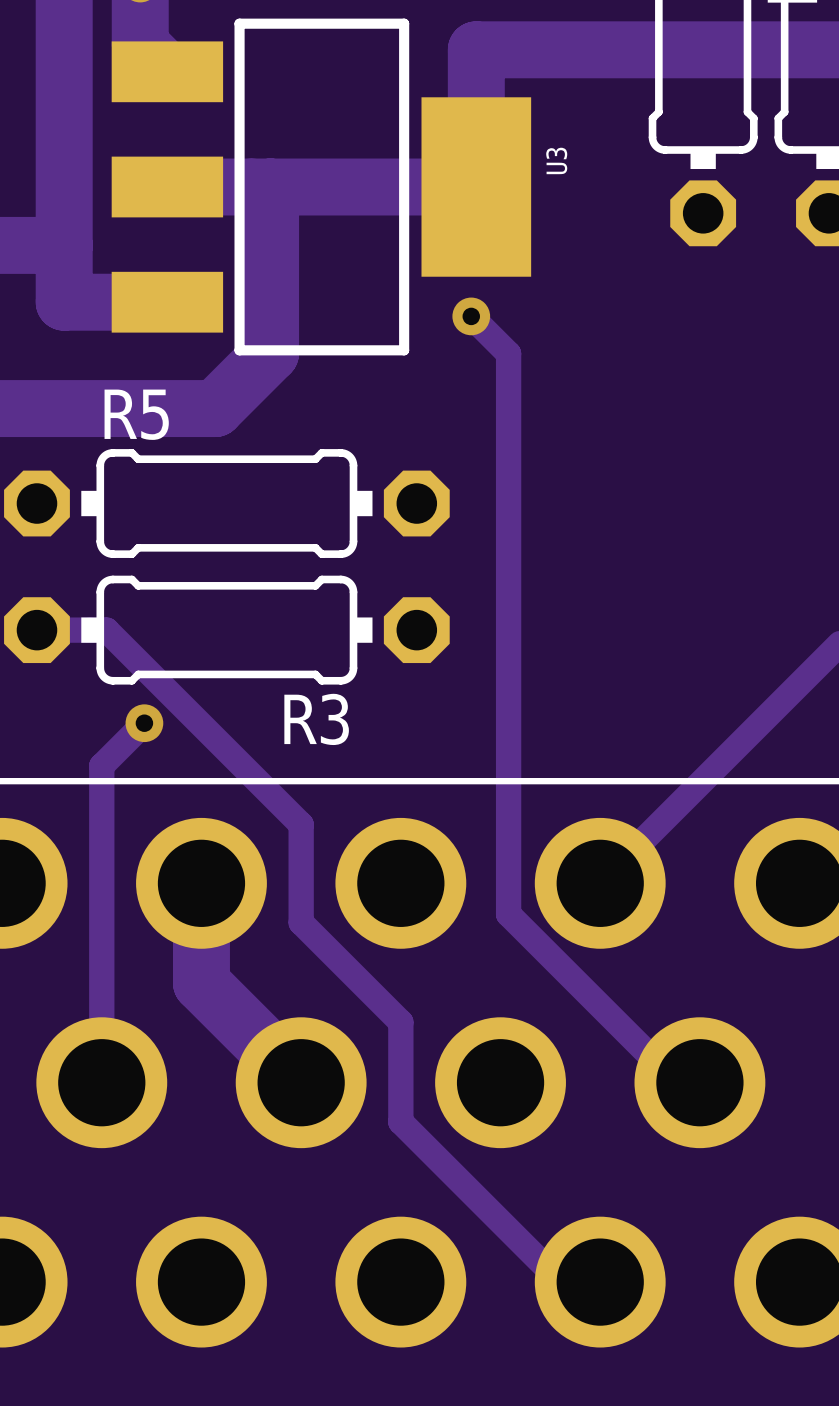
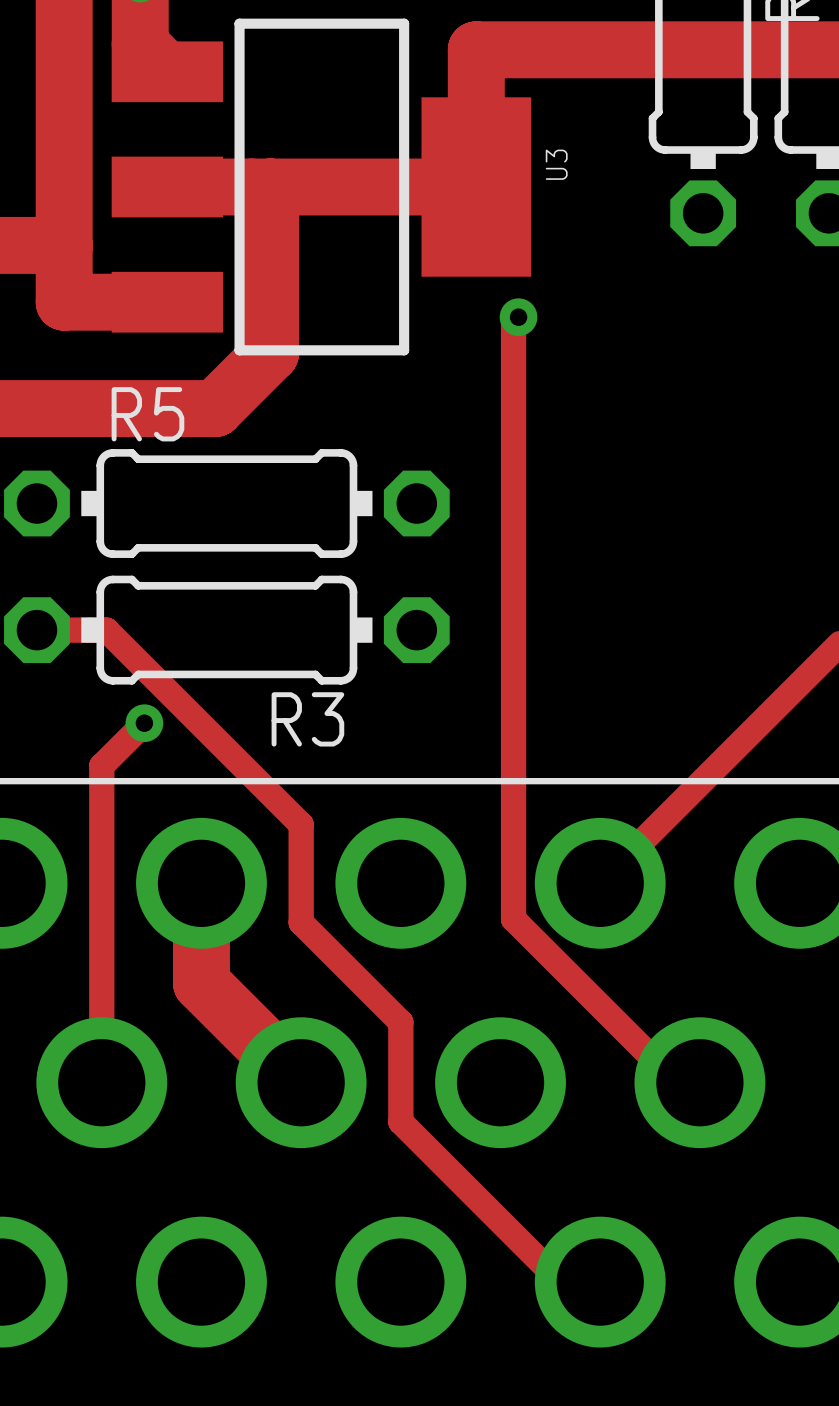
track: (471, 316) (508, 353) (508, 914) (513, 919) -> (518, 317) (513, 322) (513, 919)
via position: (471, 316) -> (518, 317)

